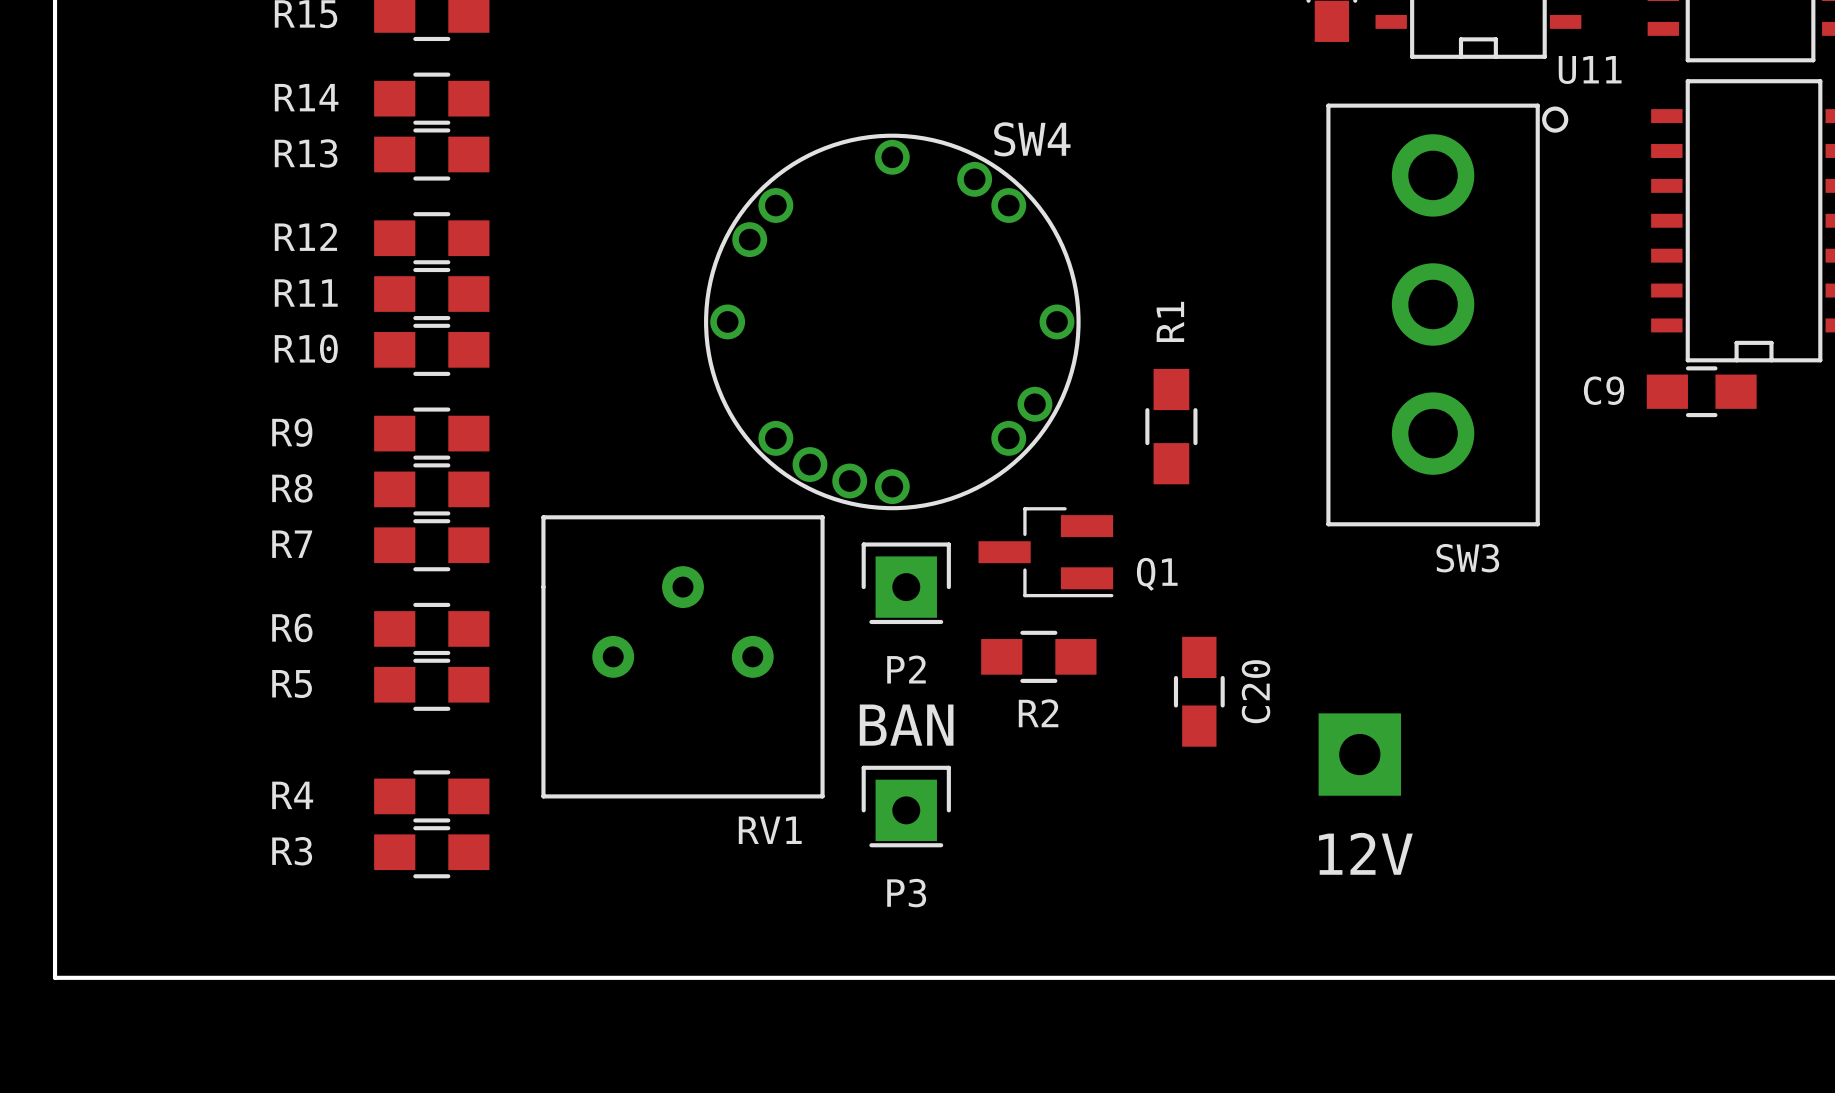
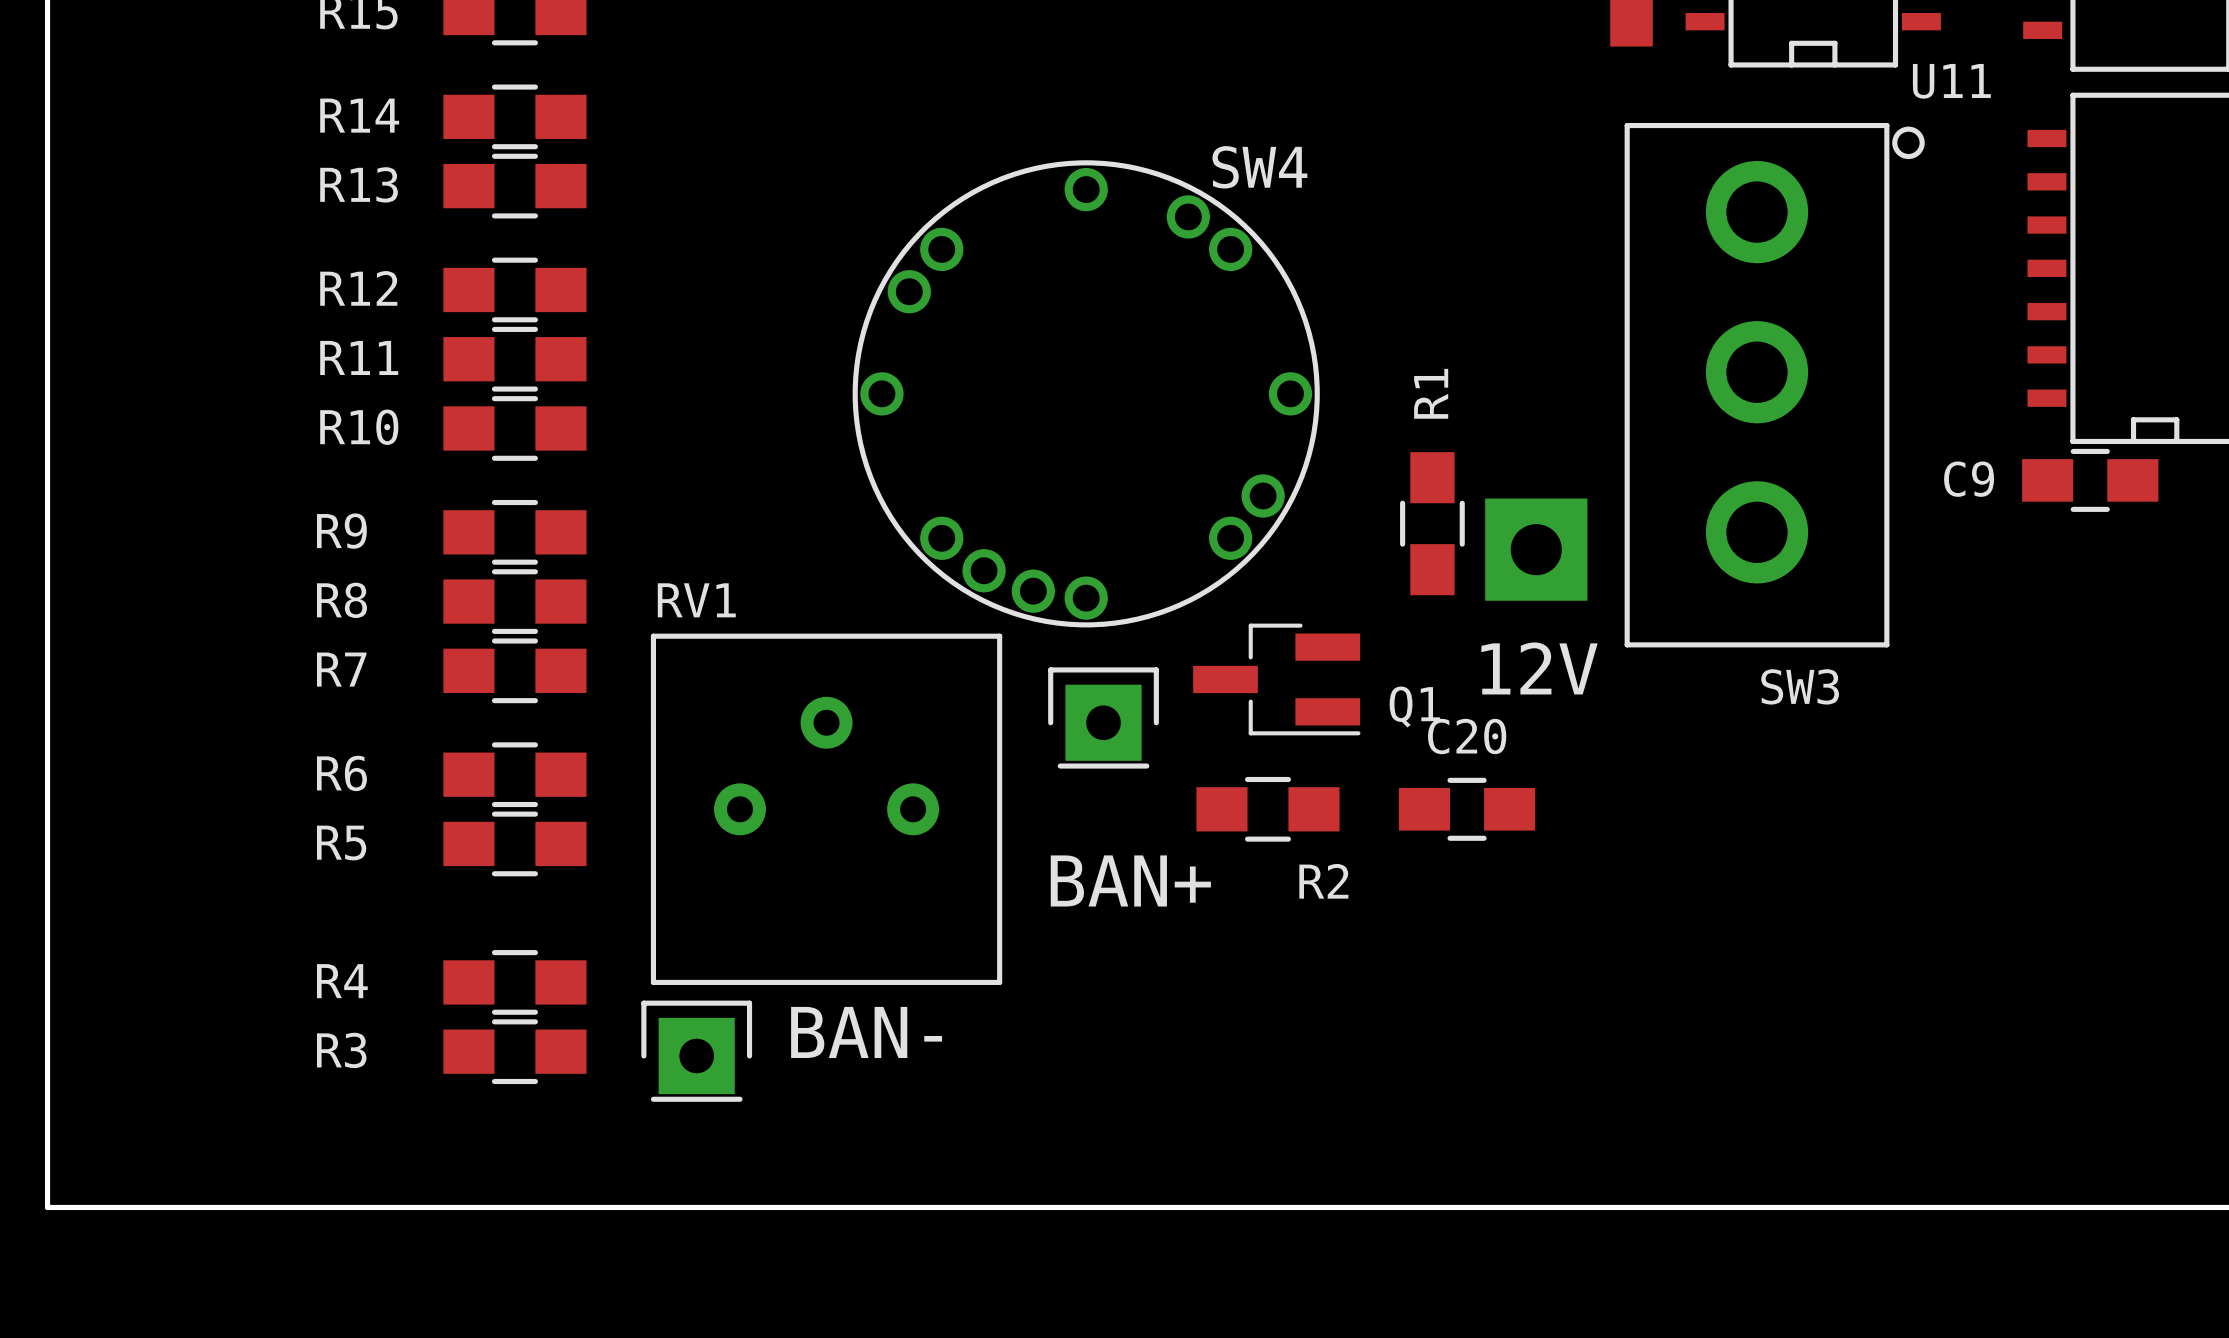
P2 name: P2 (906, 669) -> none
C20 rotation: 0° (1199, 691) -> 90° clockwise (1467, 809)
C20 name position: C20 (1256, 691) -> C20 (1467, 736)
R2 name position: R2 (1038, 713) -> R2 (1323, 881)
text: BAN (906, 725) -> BAN+ (1130, 880)
part position: (1359, 754) -> (1536, 549)
P3: (906, 806) -> none
RV1 name position: RV1 (770, 830) -> RV1 (696, 600)
text: none -> BAN- (866, 1032)
part: none -> (696, 1051)
text position: 12V (1365, 853) -> 12V (1539, 668)

